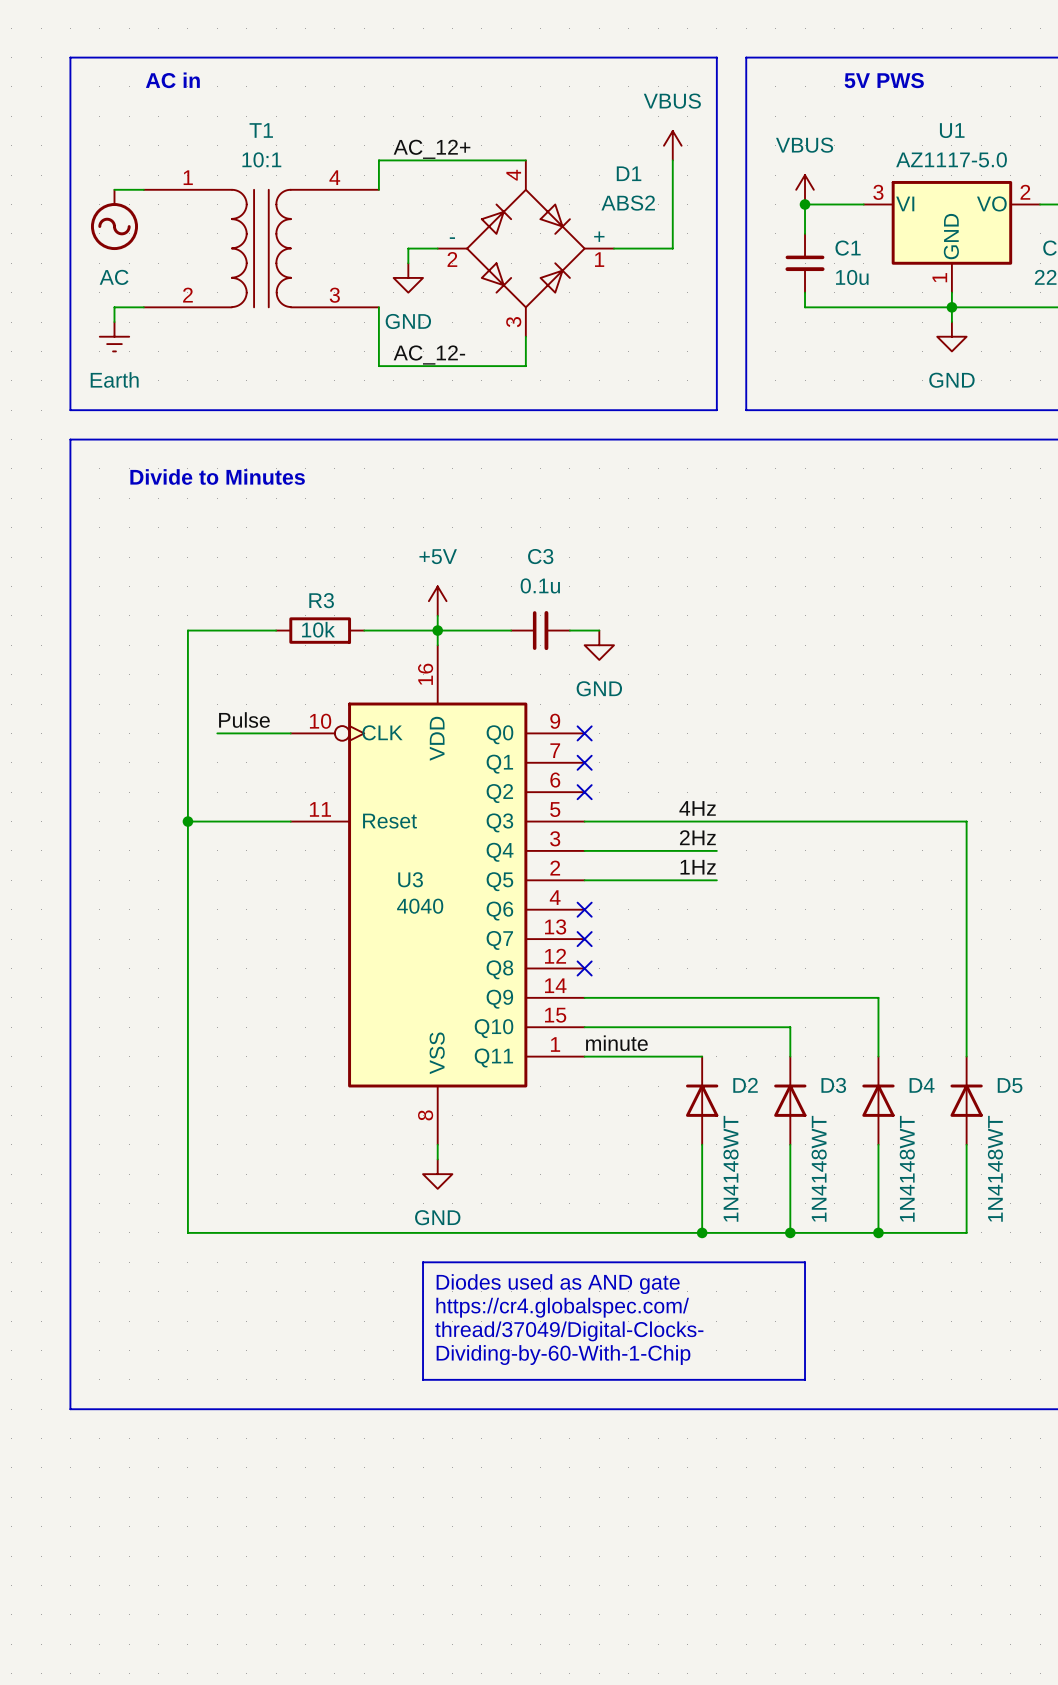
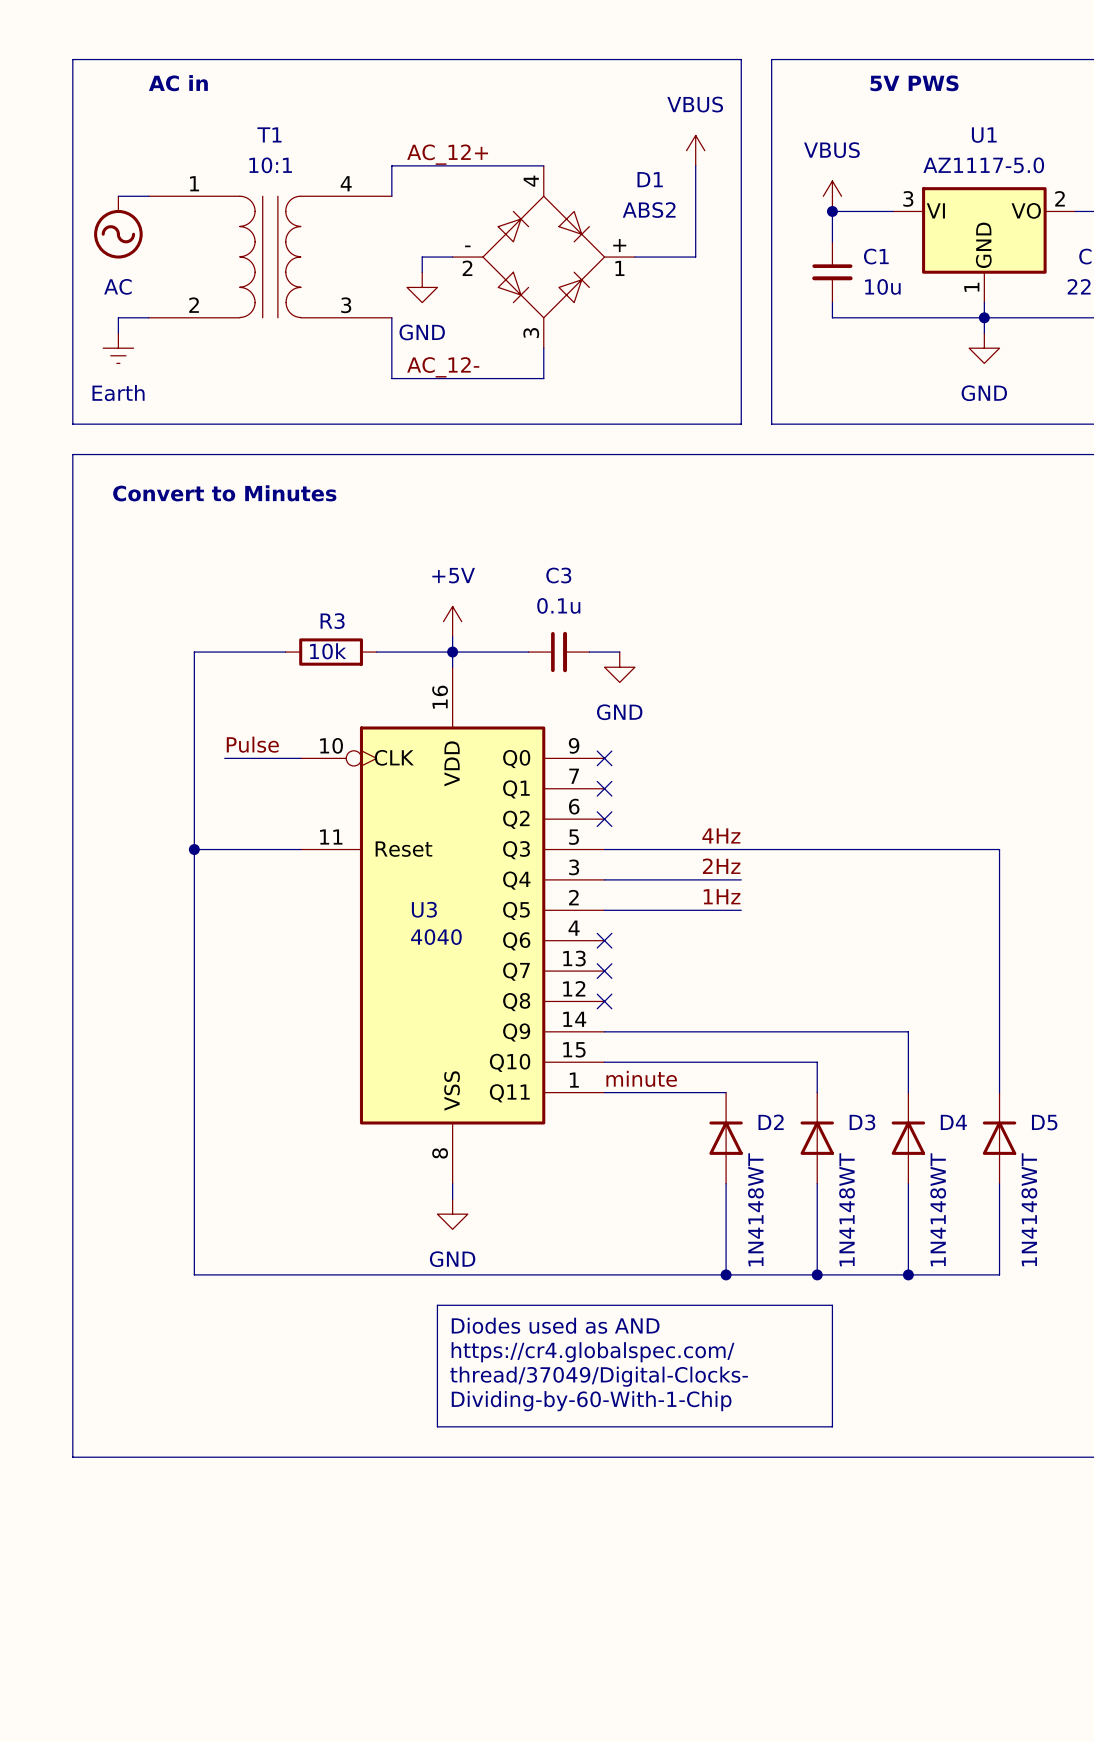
text: Divide to Minutes (217, 476) -> Convert to Minutes (224, 493)
text: Diodes used as AND gate (558, 1284) -> Diodes used as AND (555, 1325)

